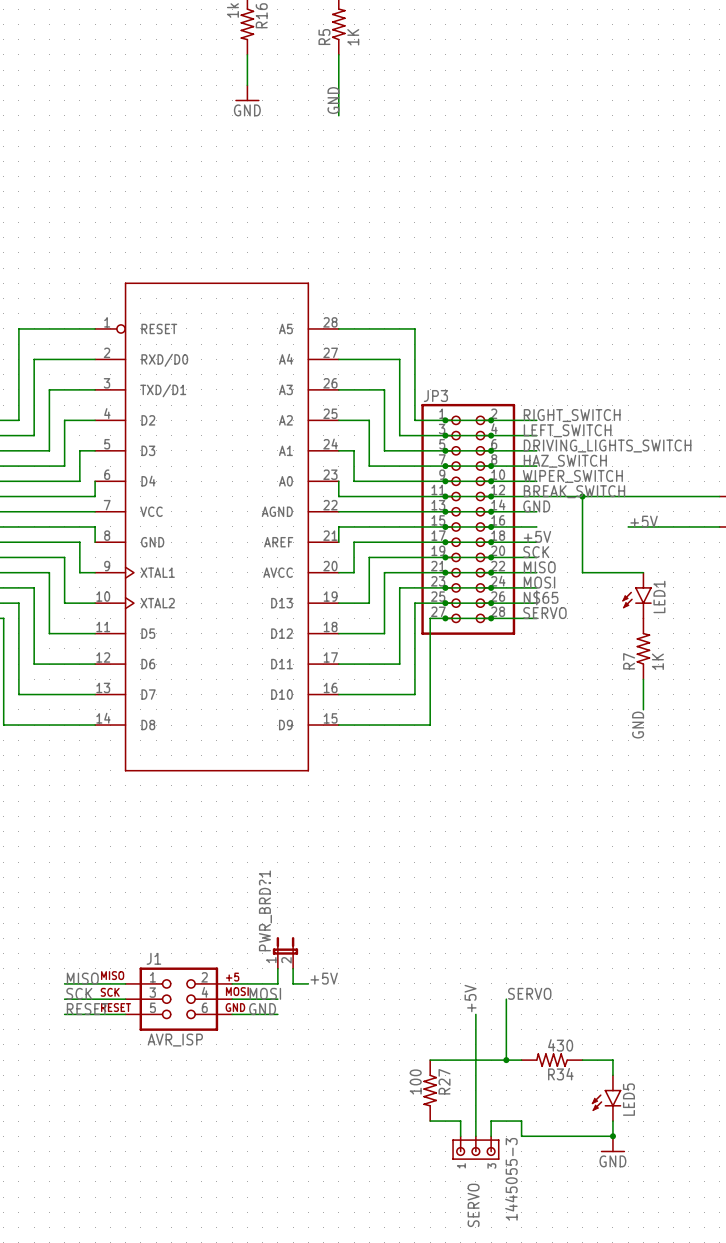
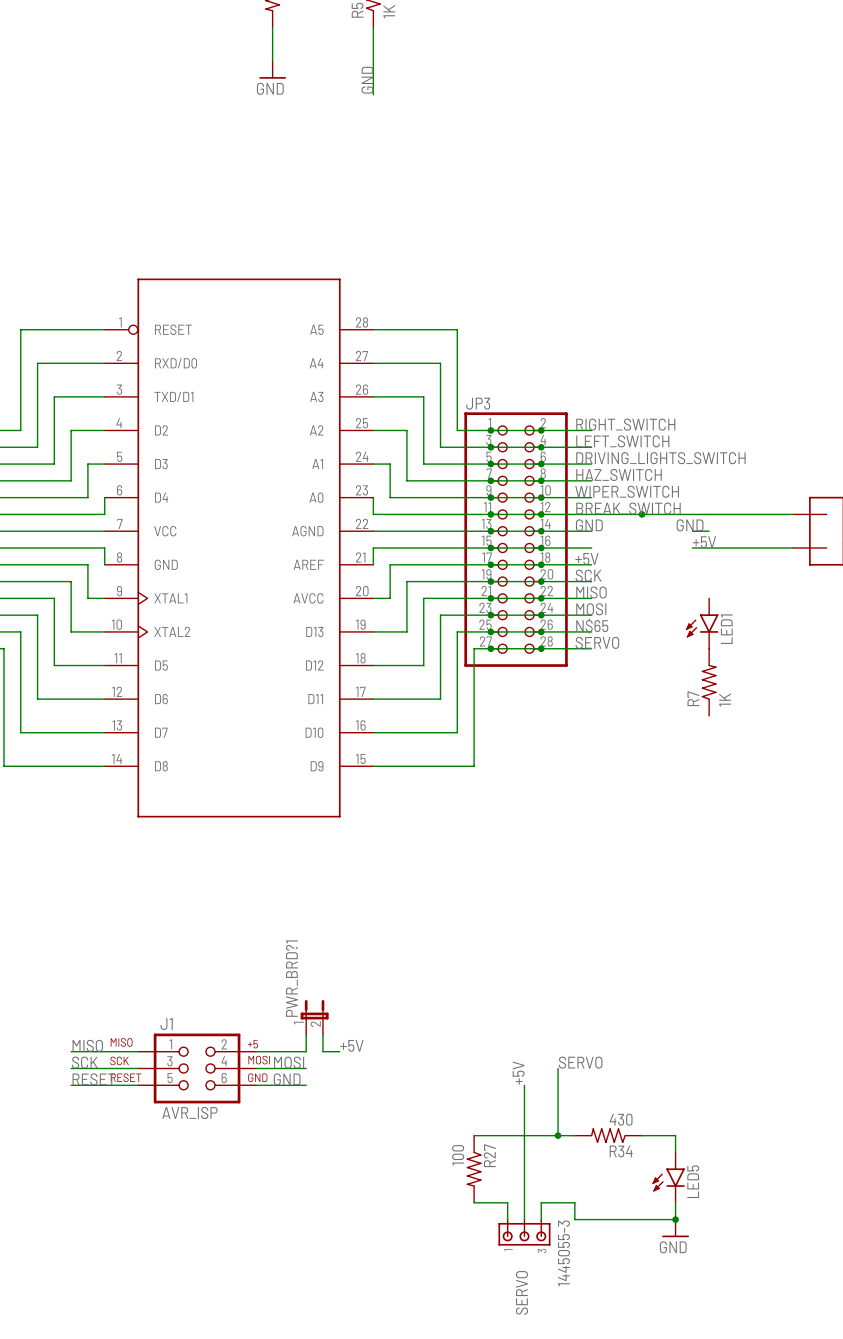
wire: (582, 496) (582, 572) (643, 572) -> none
label: none -> GND (690, 525)
wire: none -> (692, 531) (709, 531)
wire: (643, 679) (643, 709) -> none
label: GND (638, 725) -> none

